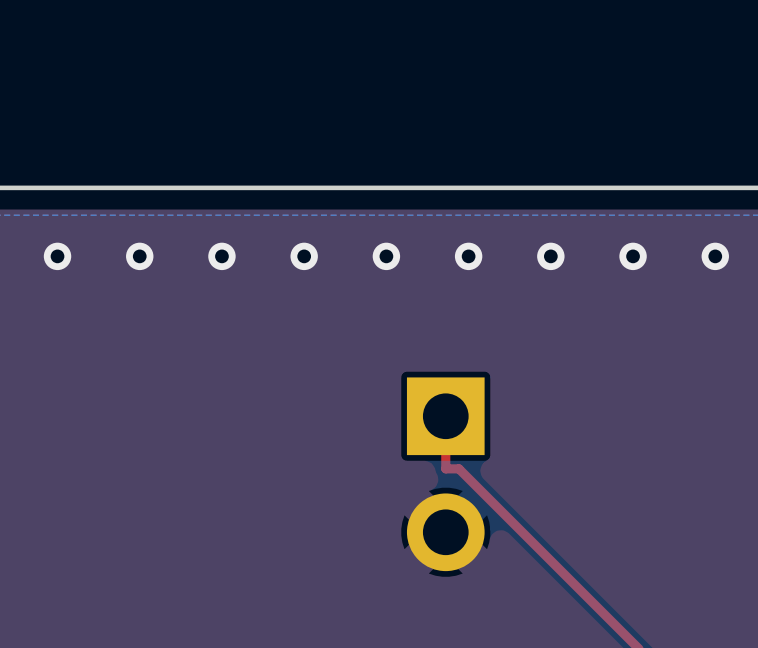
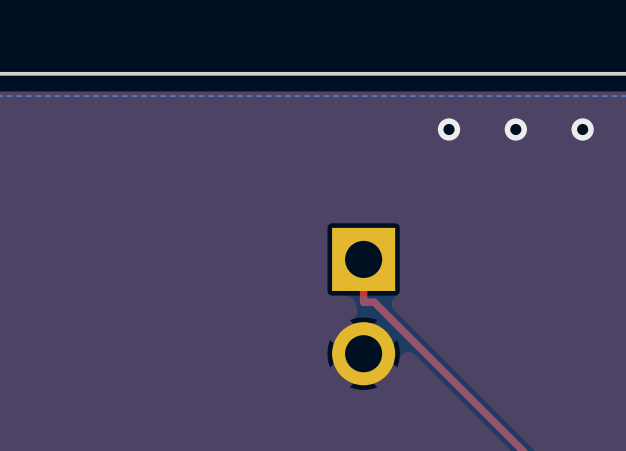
via: (57, 256) -> none
via: (139, 256) -> none
via: (221, 256) -> none
via: (304, 256) -> none
via: (386, 256) -> none
via: (468, 256) -> none

